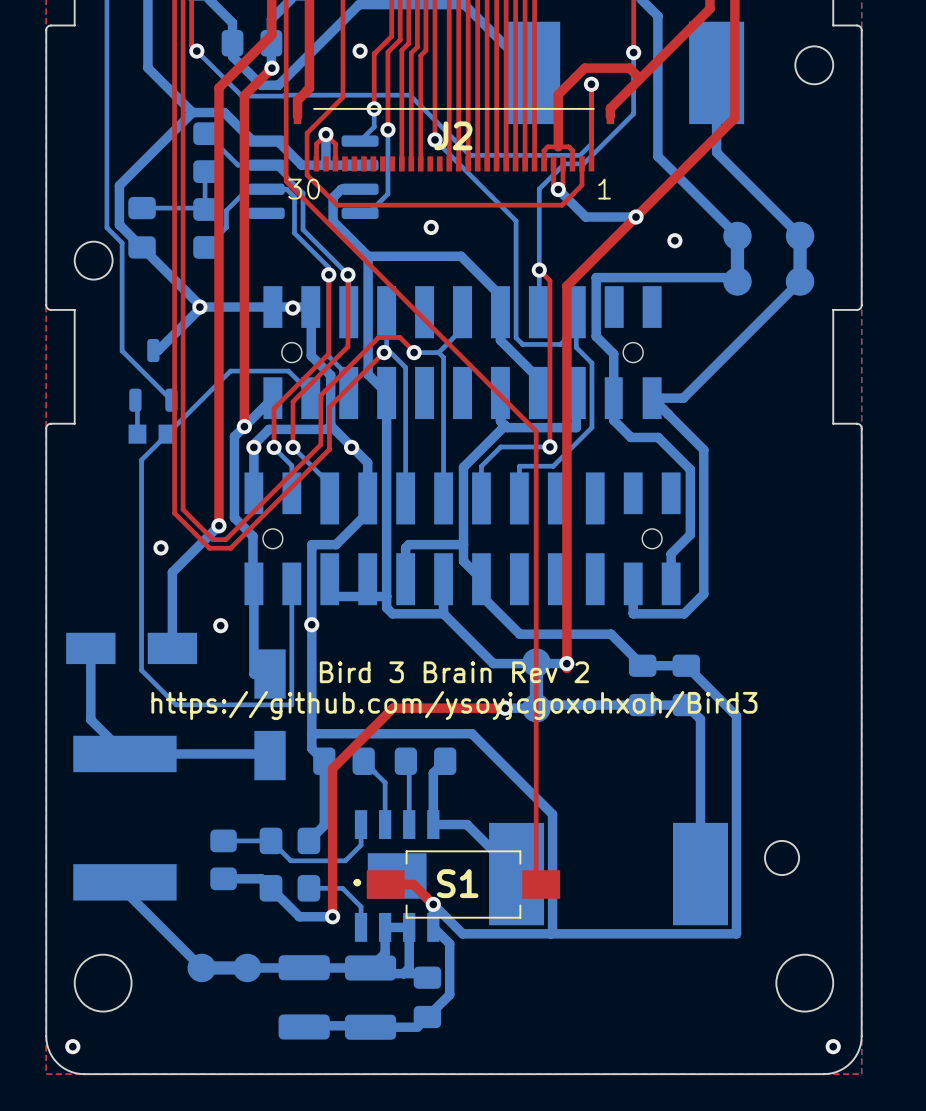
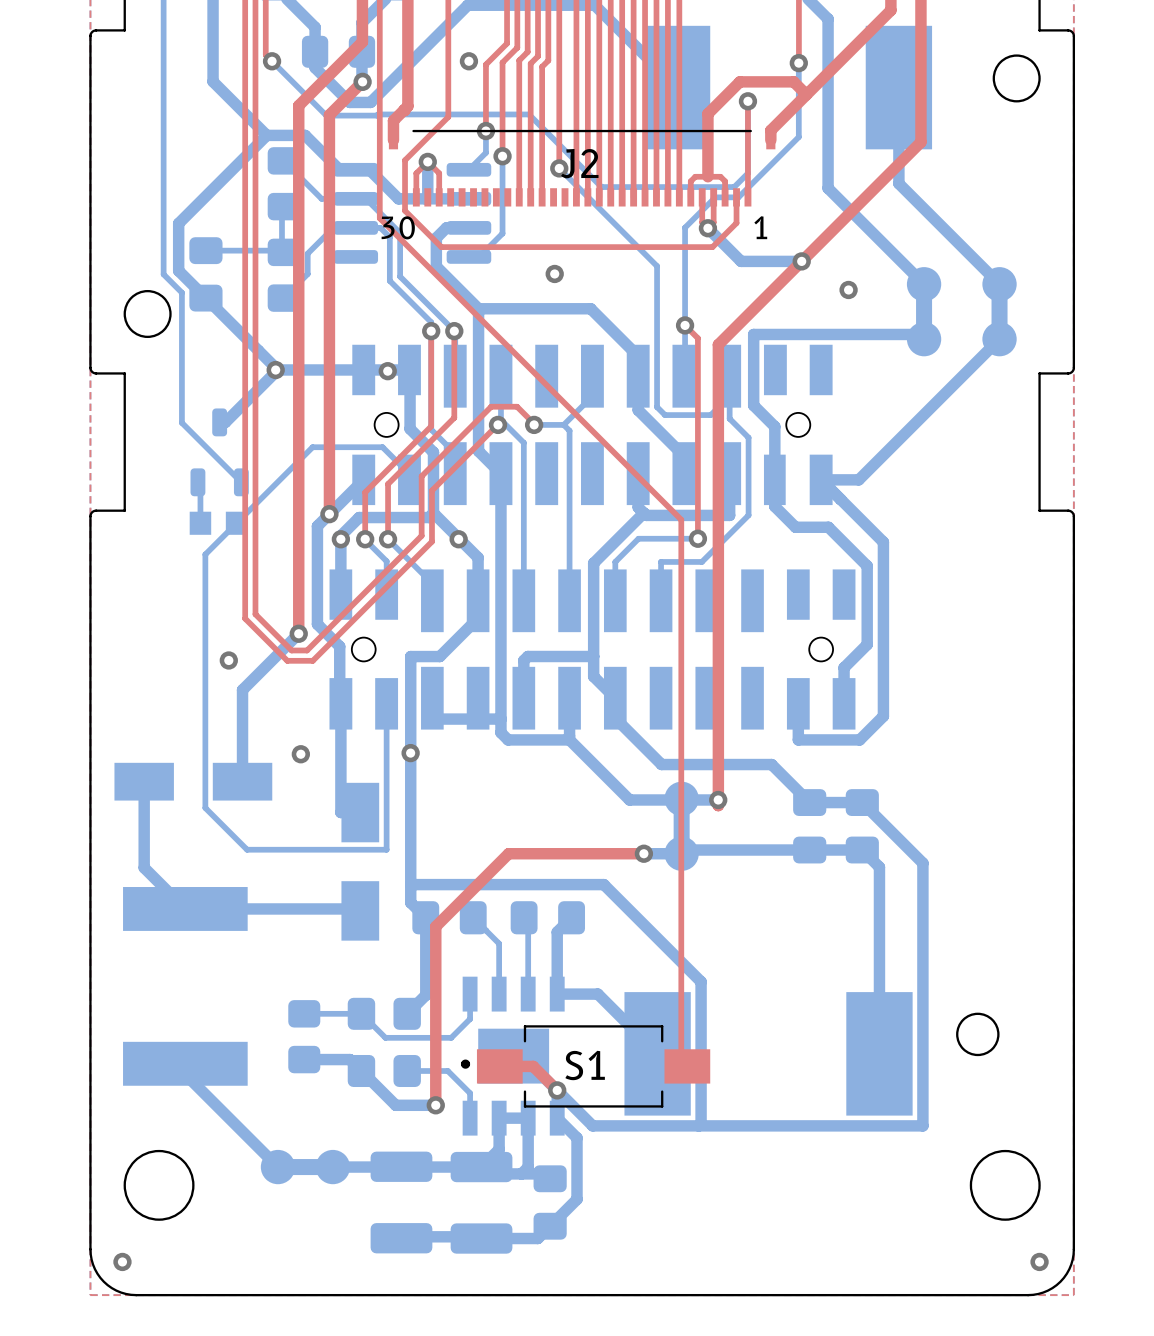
text: Bird 3 Brain Rev 2 (454, 672) -> none
text: https://github.com/ysoyjcgoxohxoh/Bird3 (454, 705) -> none

